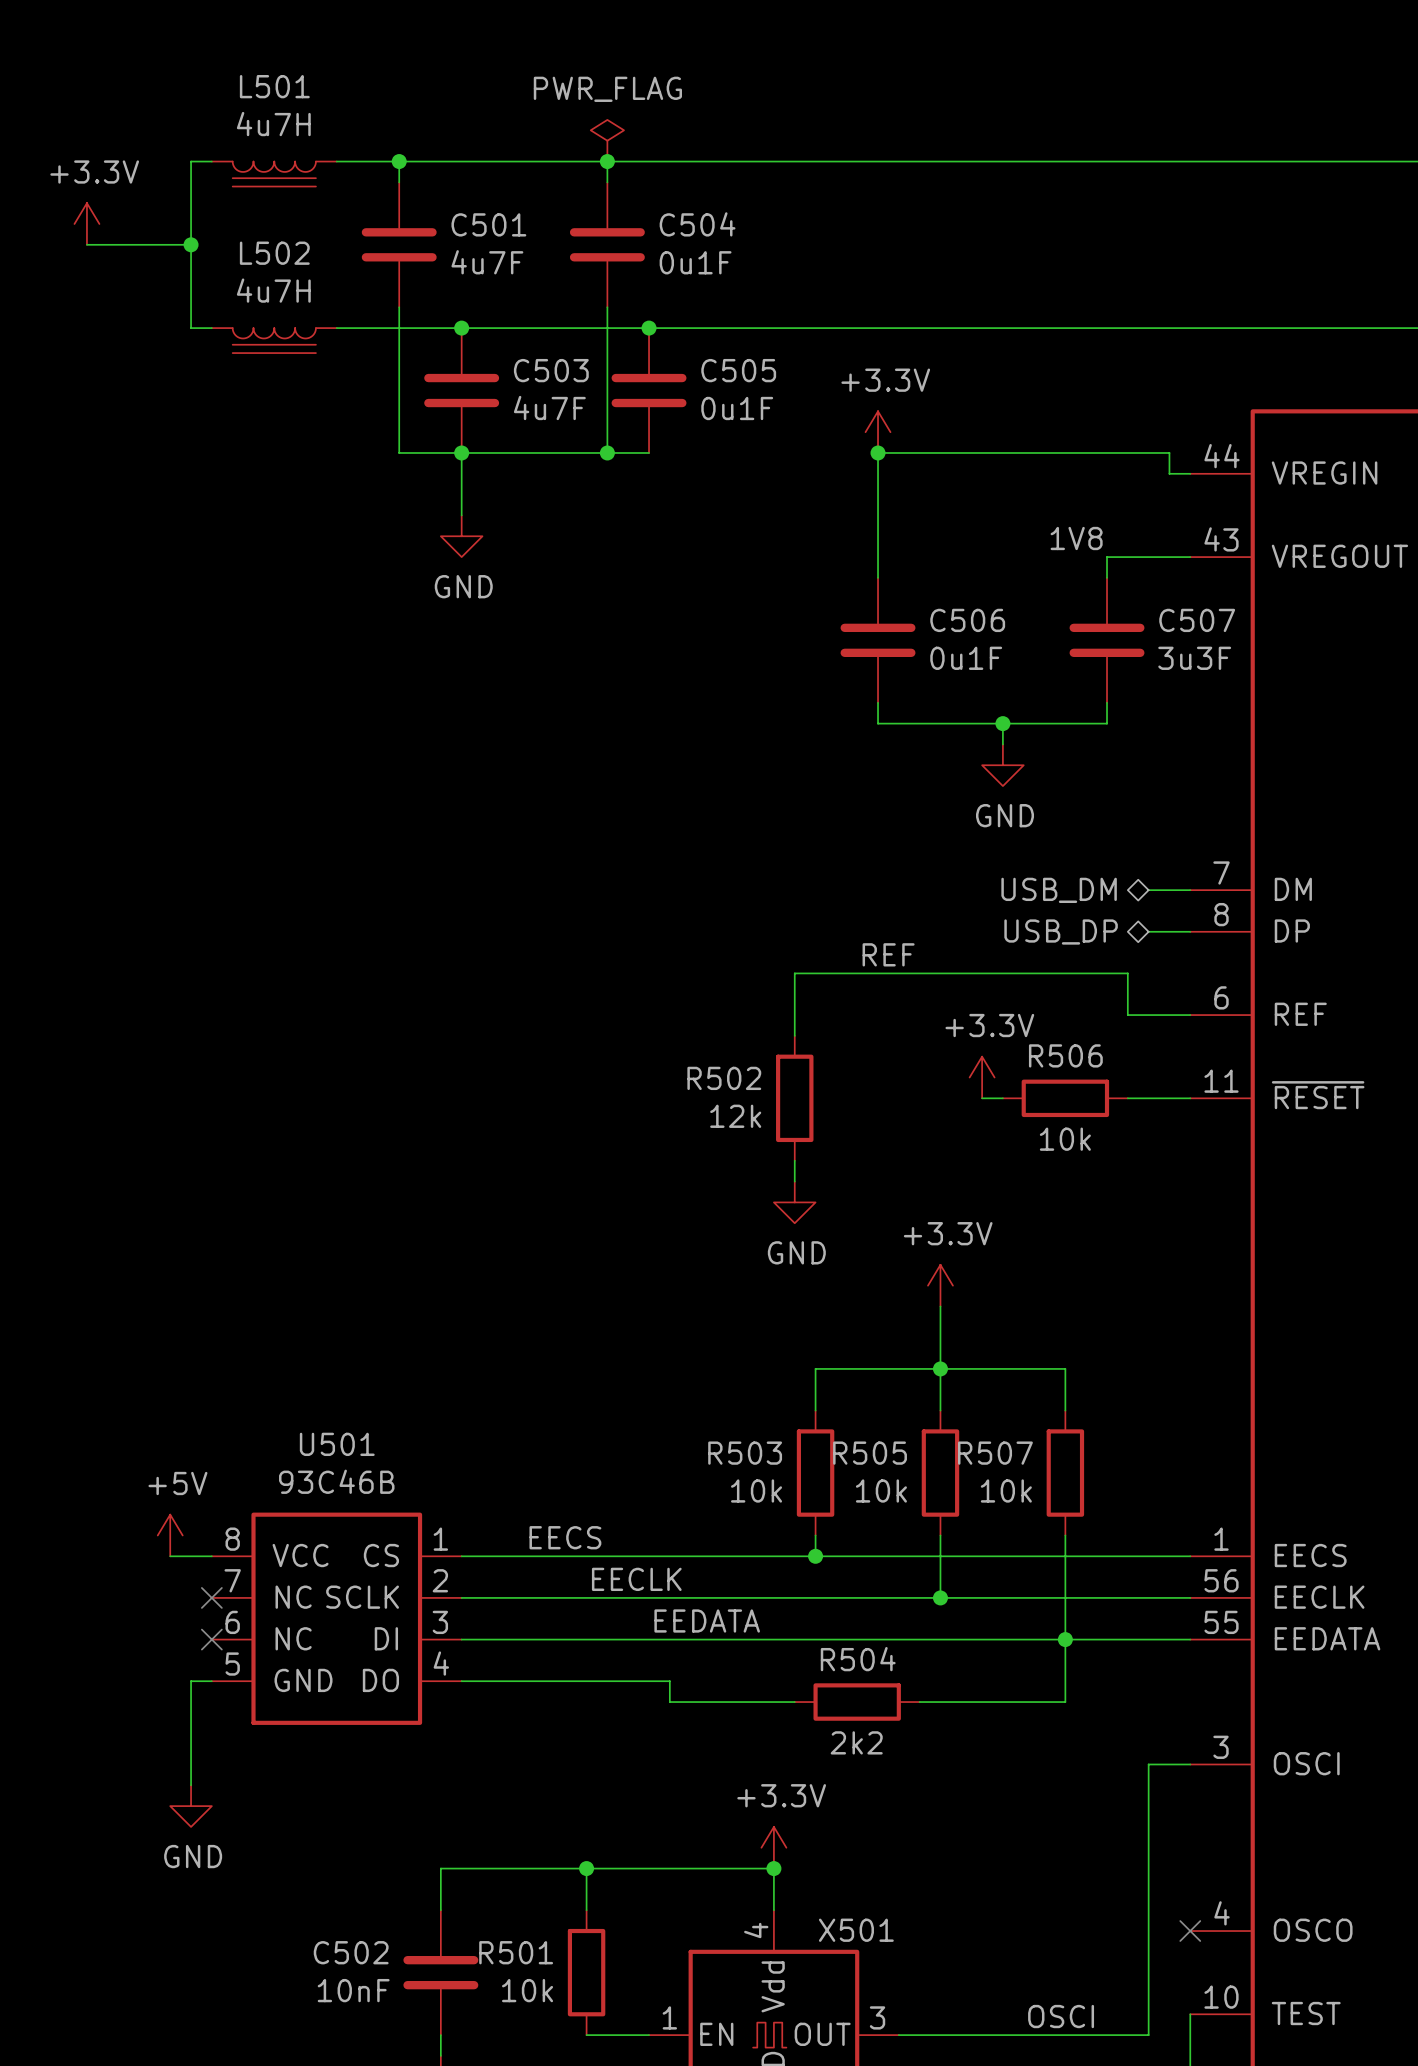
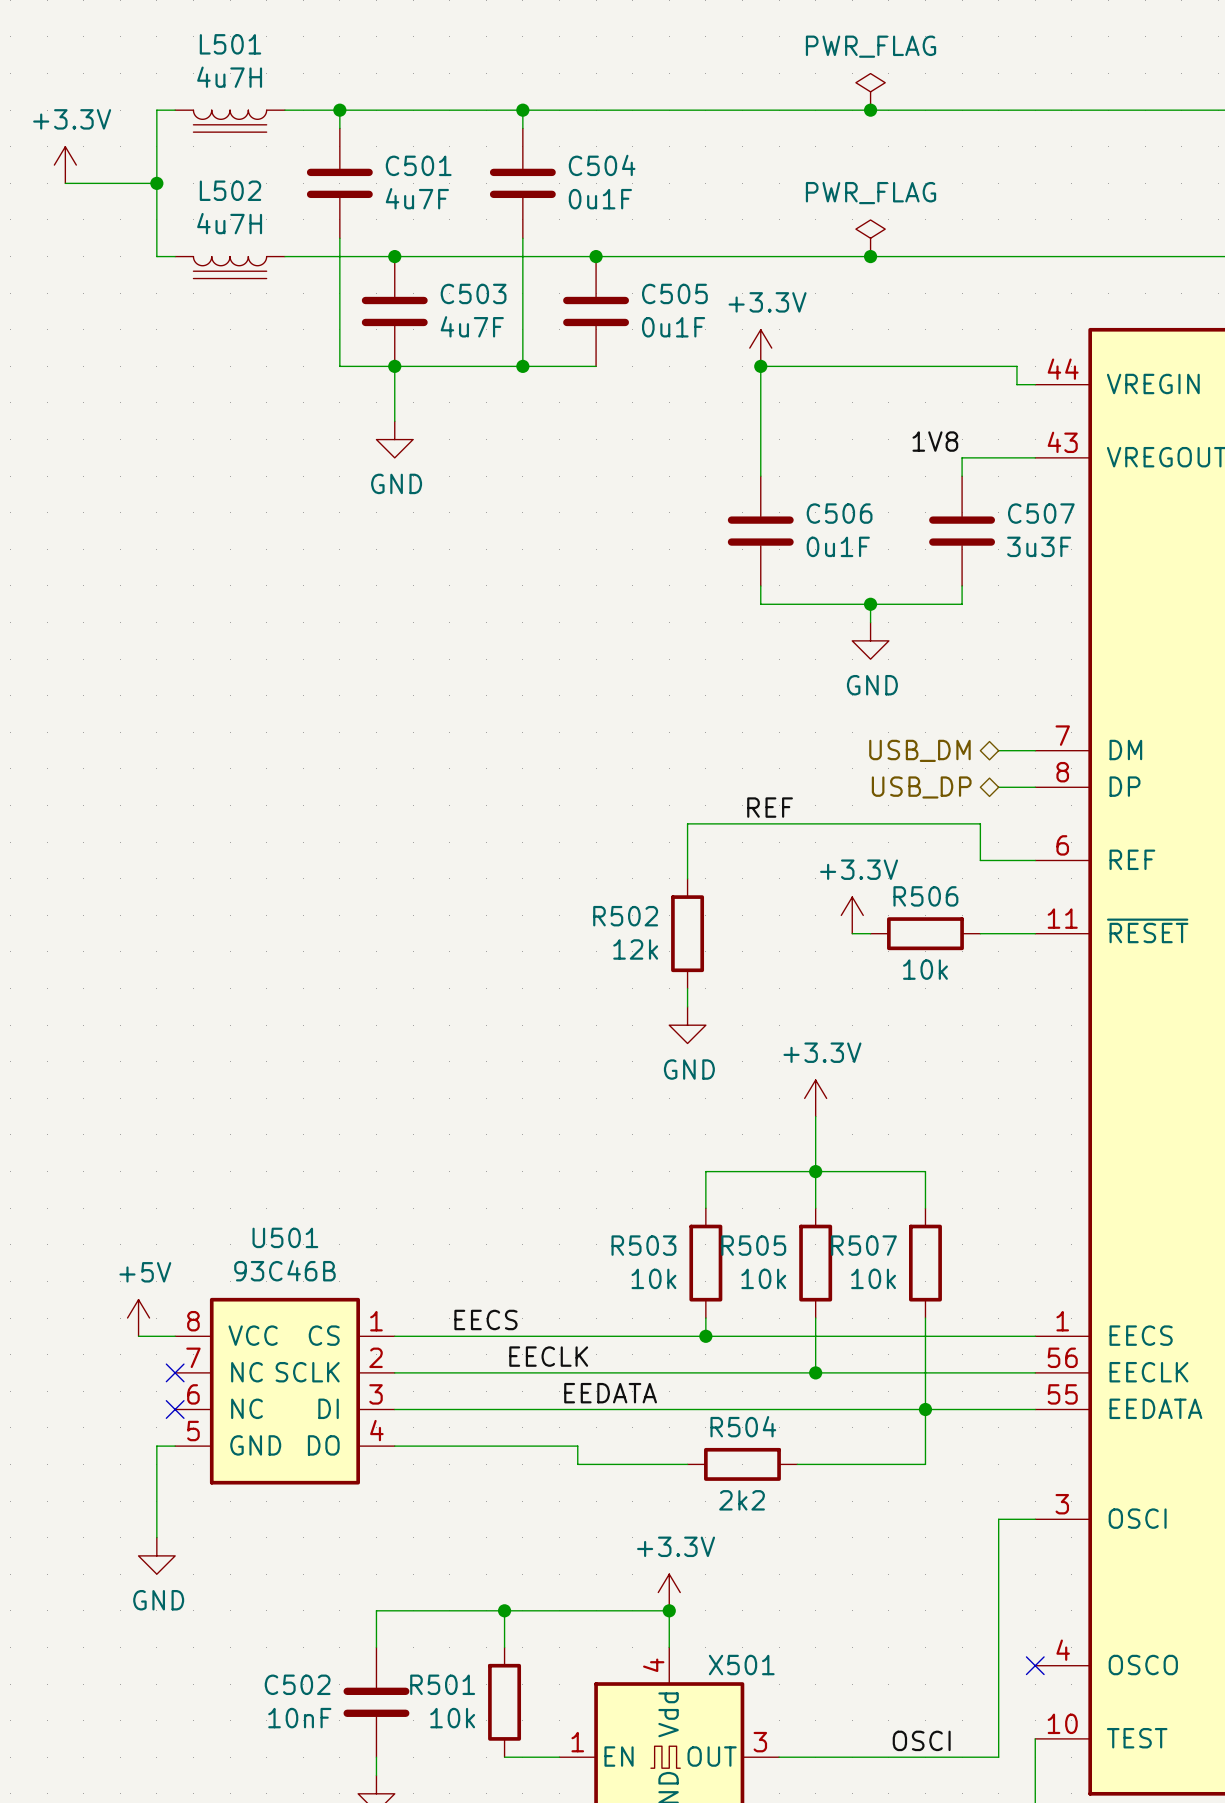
power symbol: PWR_FLAG (607, 140) -> none
power symbol: none -> PWR_FLAG (870, 91)
junction: none -> (870, 110)
power symbol: none -> PWR_FLAG (870, 238)
junction position: (649, 328) -> (596, 256)
junction: none -> (870, 256)
C505 position: (649, 390) -> (596, 311)
wire: none -> (559, 366) (596, 366)

